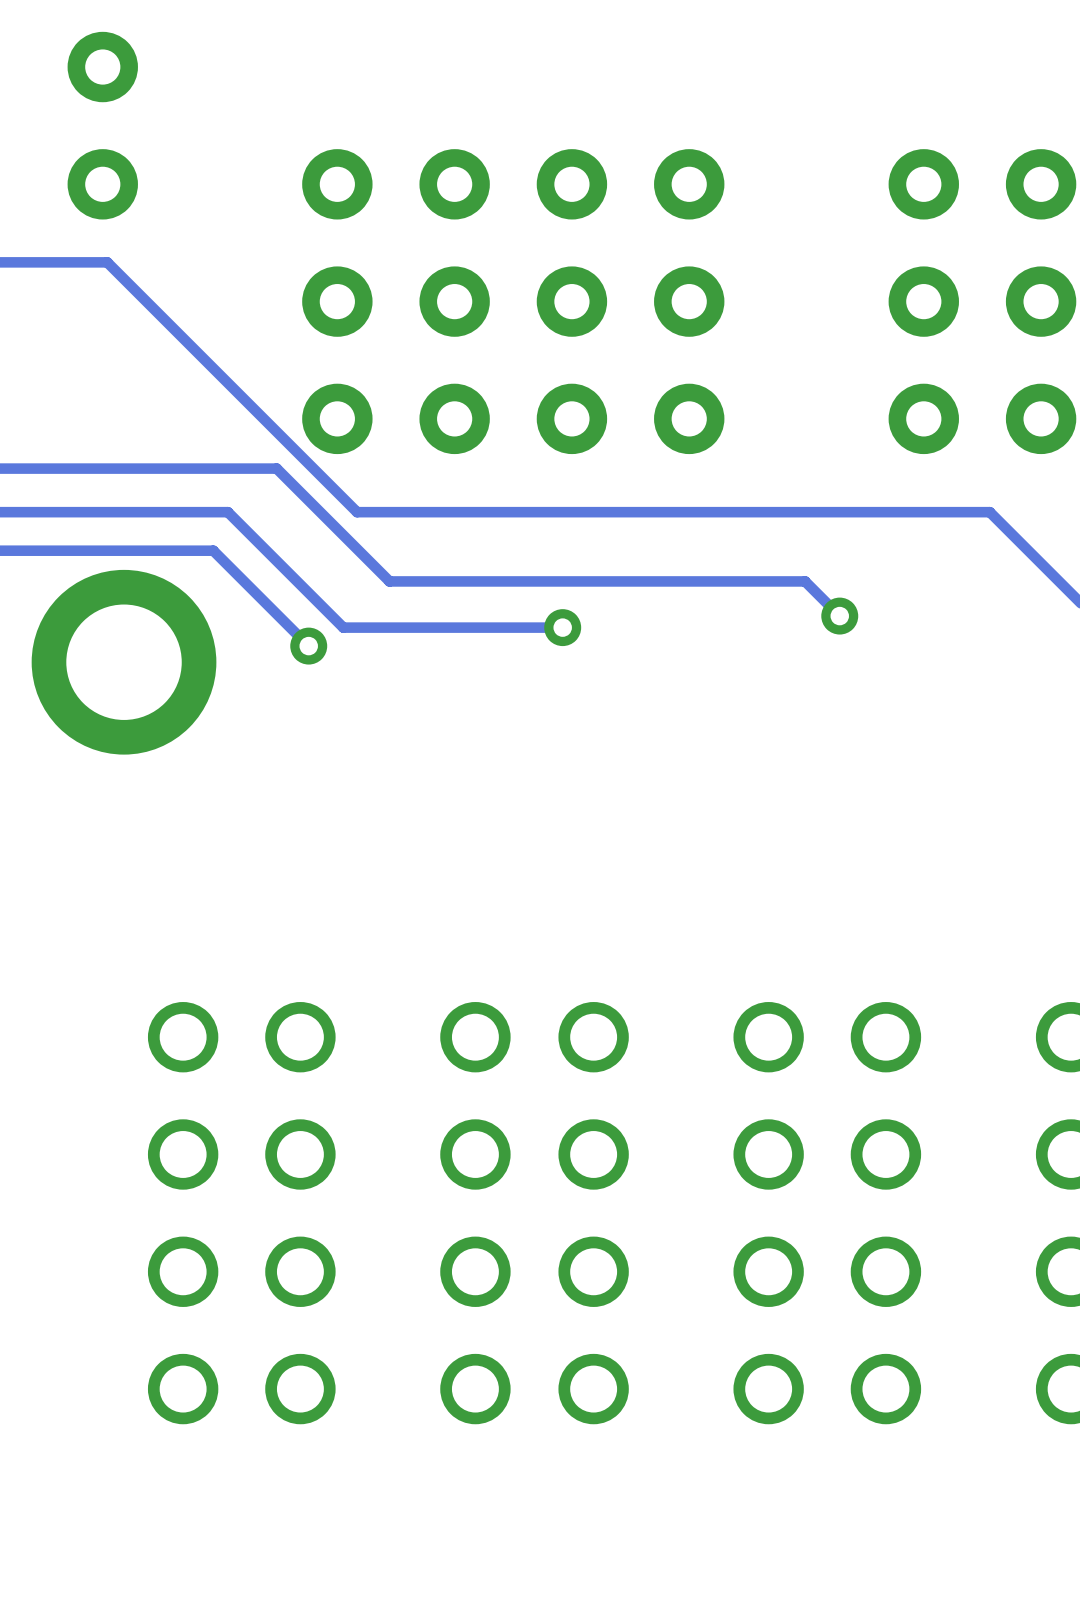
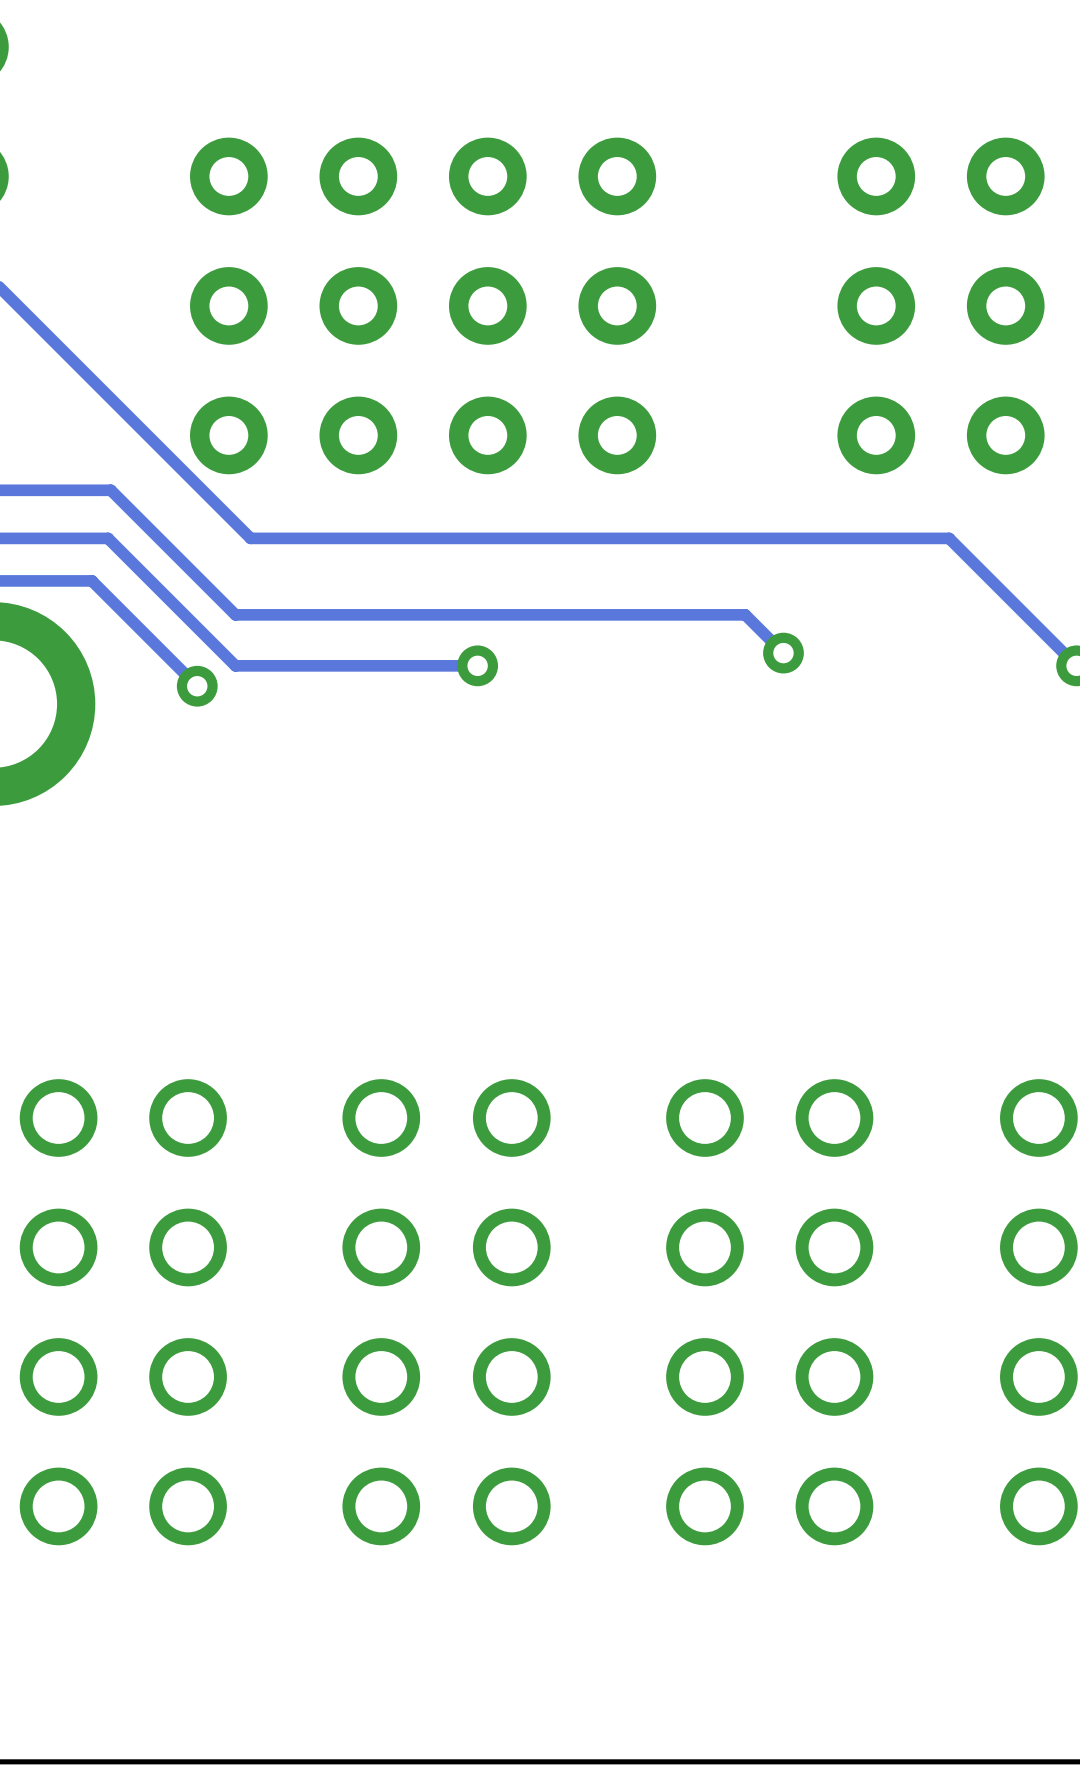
track: (230, 468) (276, 468) (389, 581) -> (110, 490) (235, 614) (286, 614)

